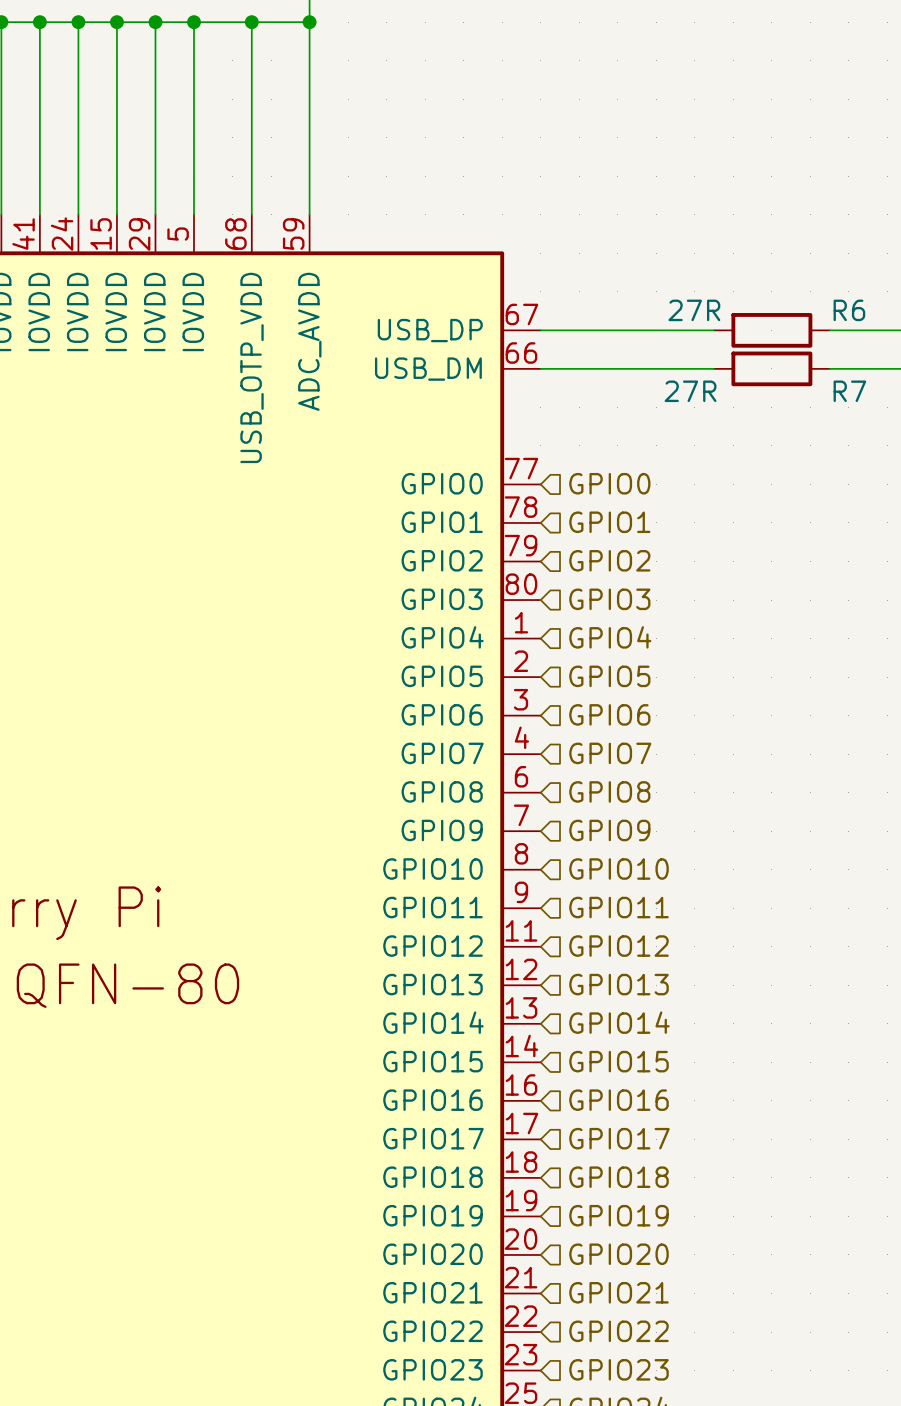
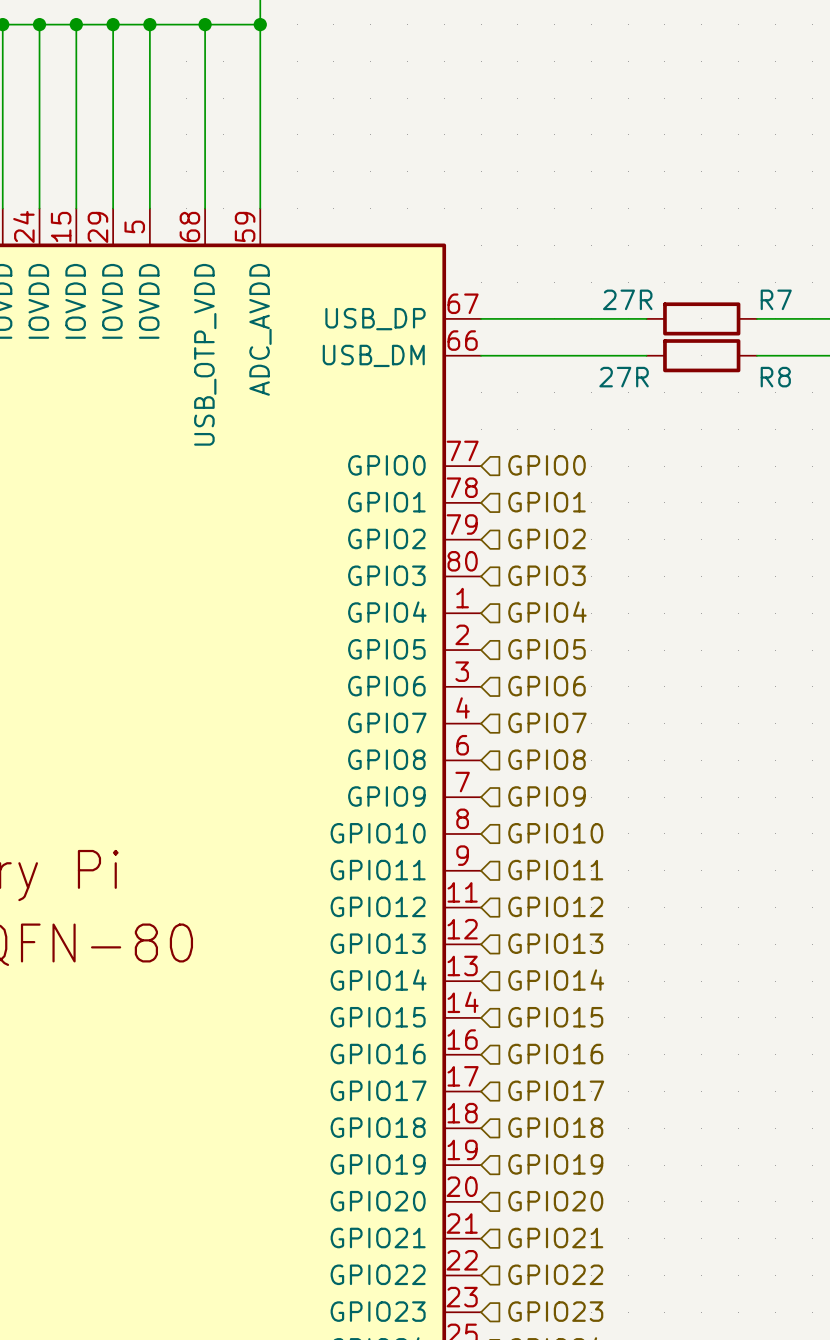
R6 name: R6 (849, 310) -> R7 (776, 299)
R7 name: R7 (849, 391) -> R8 (775, 377)

